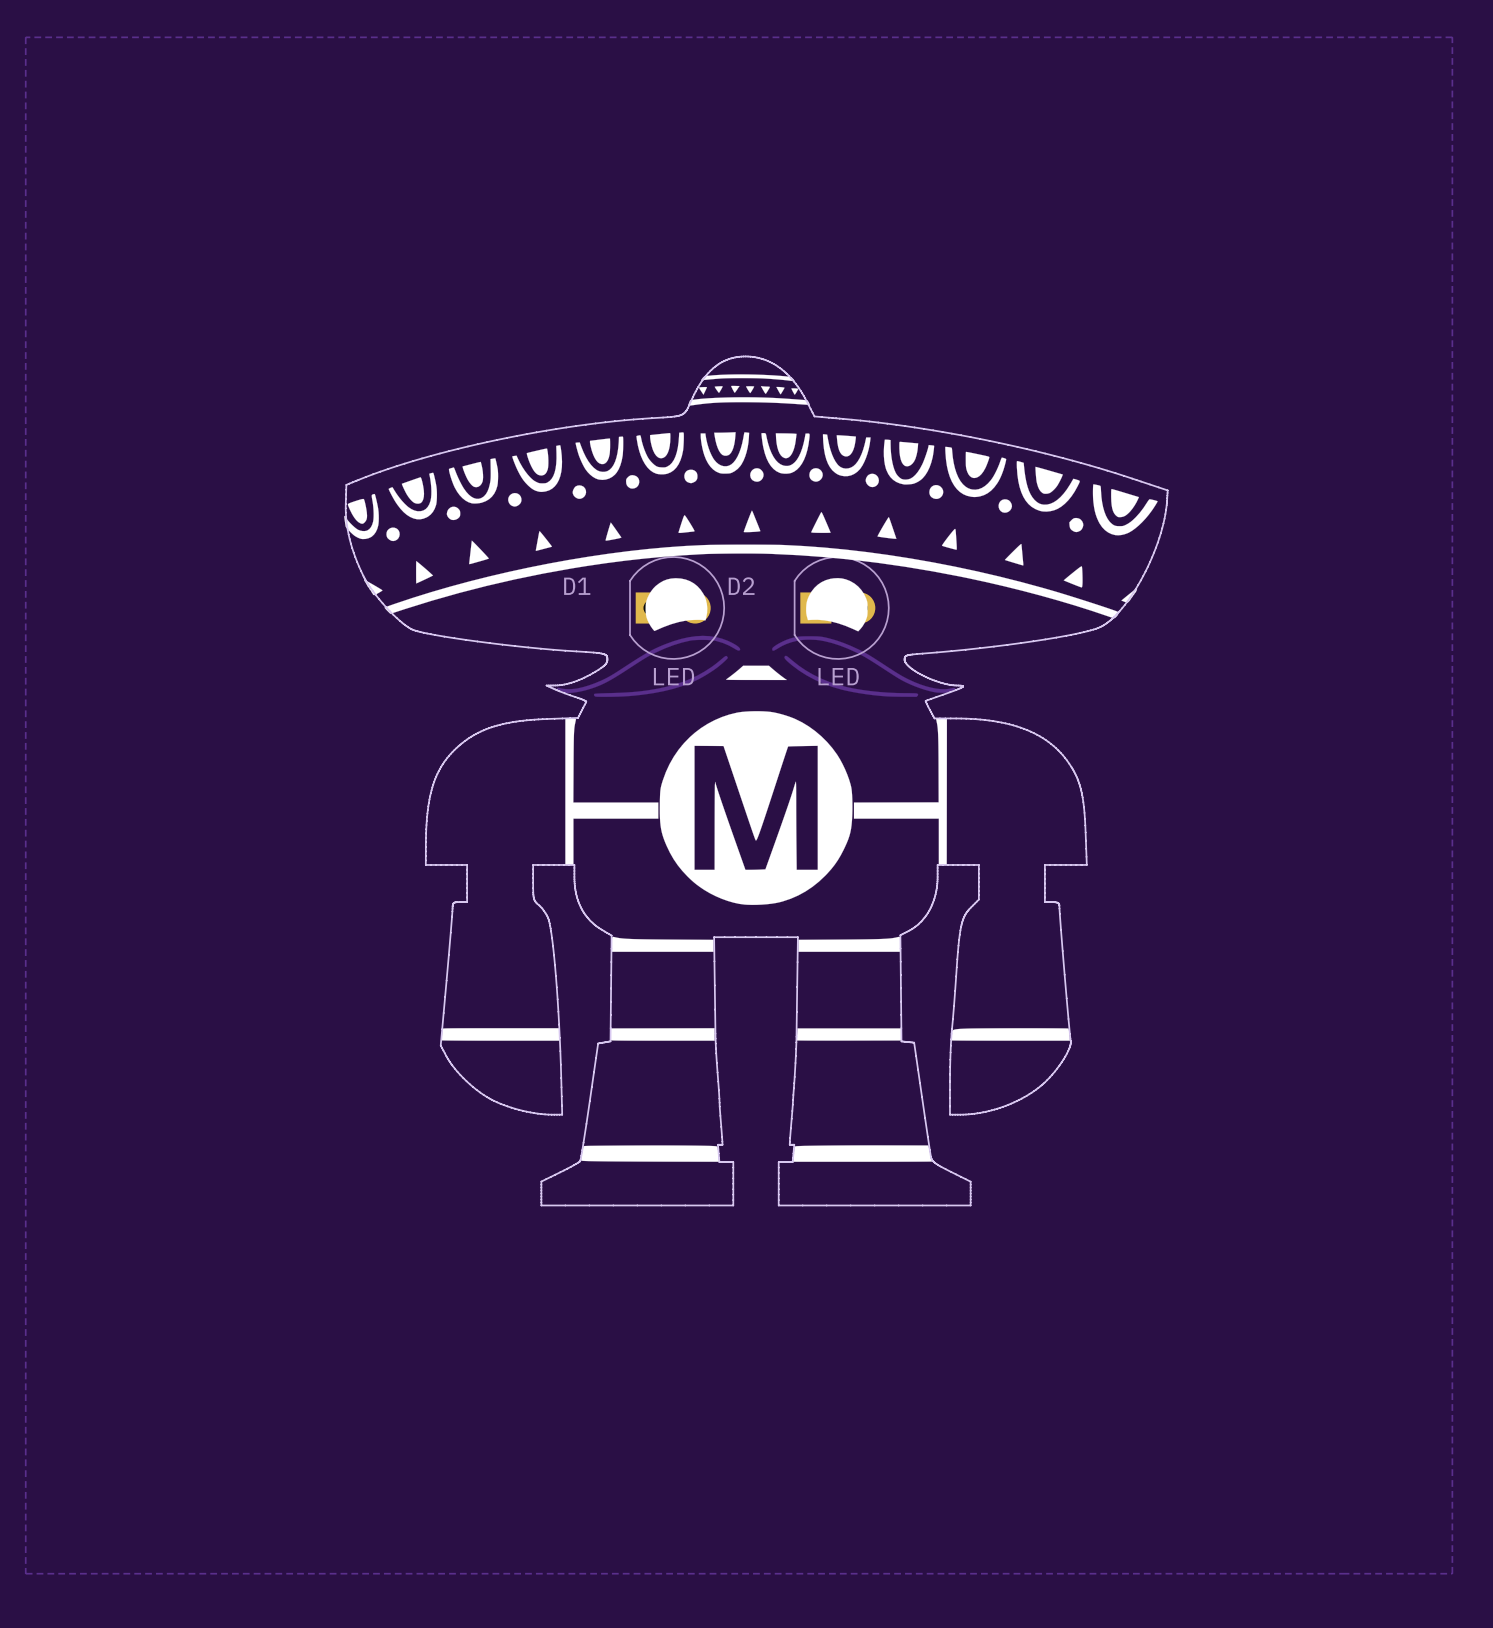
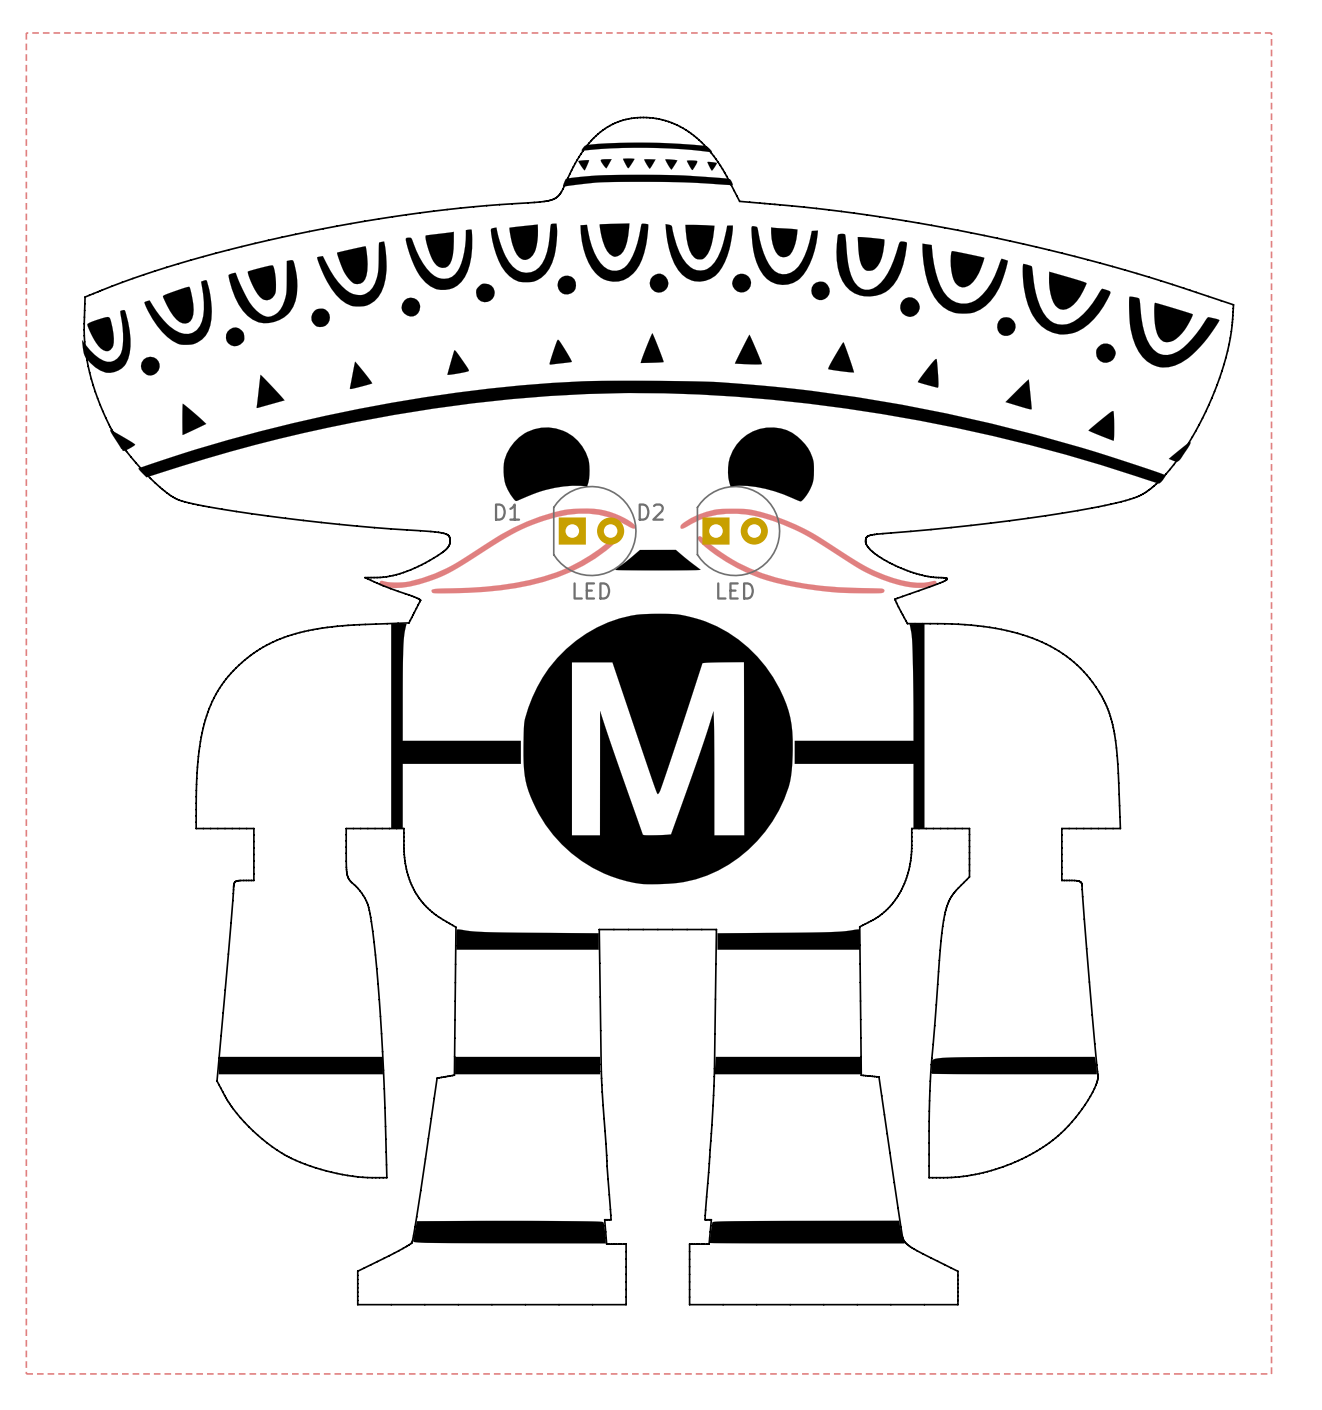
drawing: none -> [81, 116, 1235, 1306]
drawing: [344, 355, 1169, 1207] -> none

